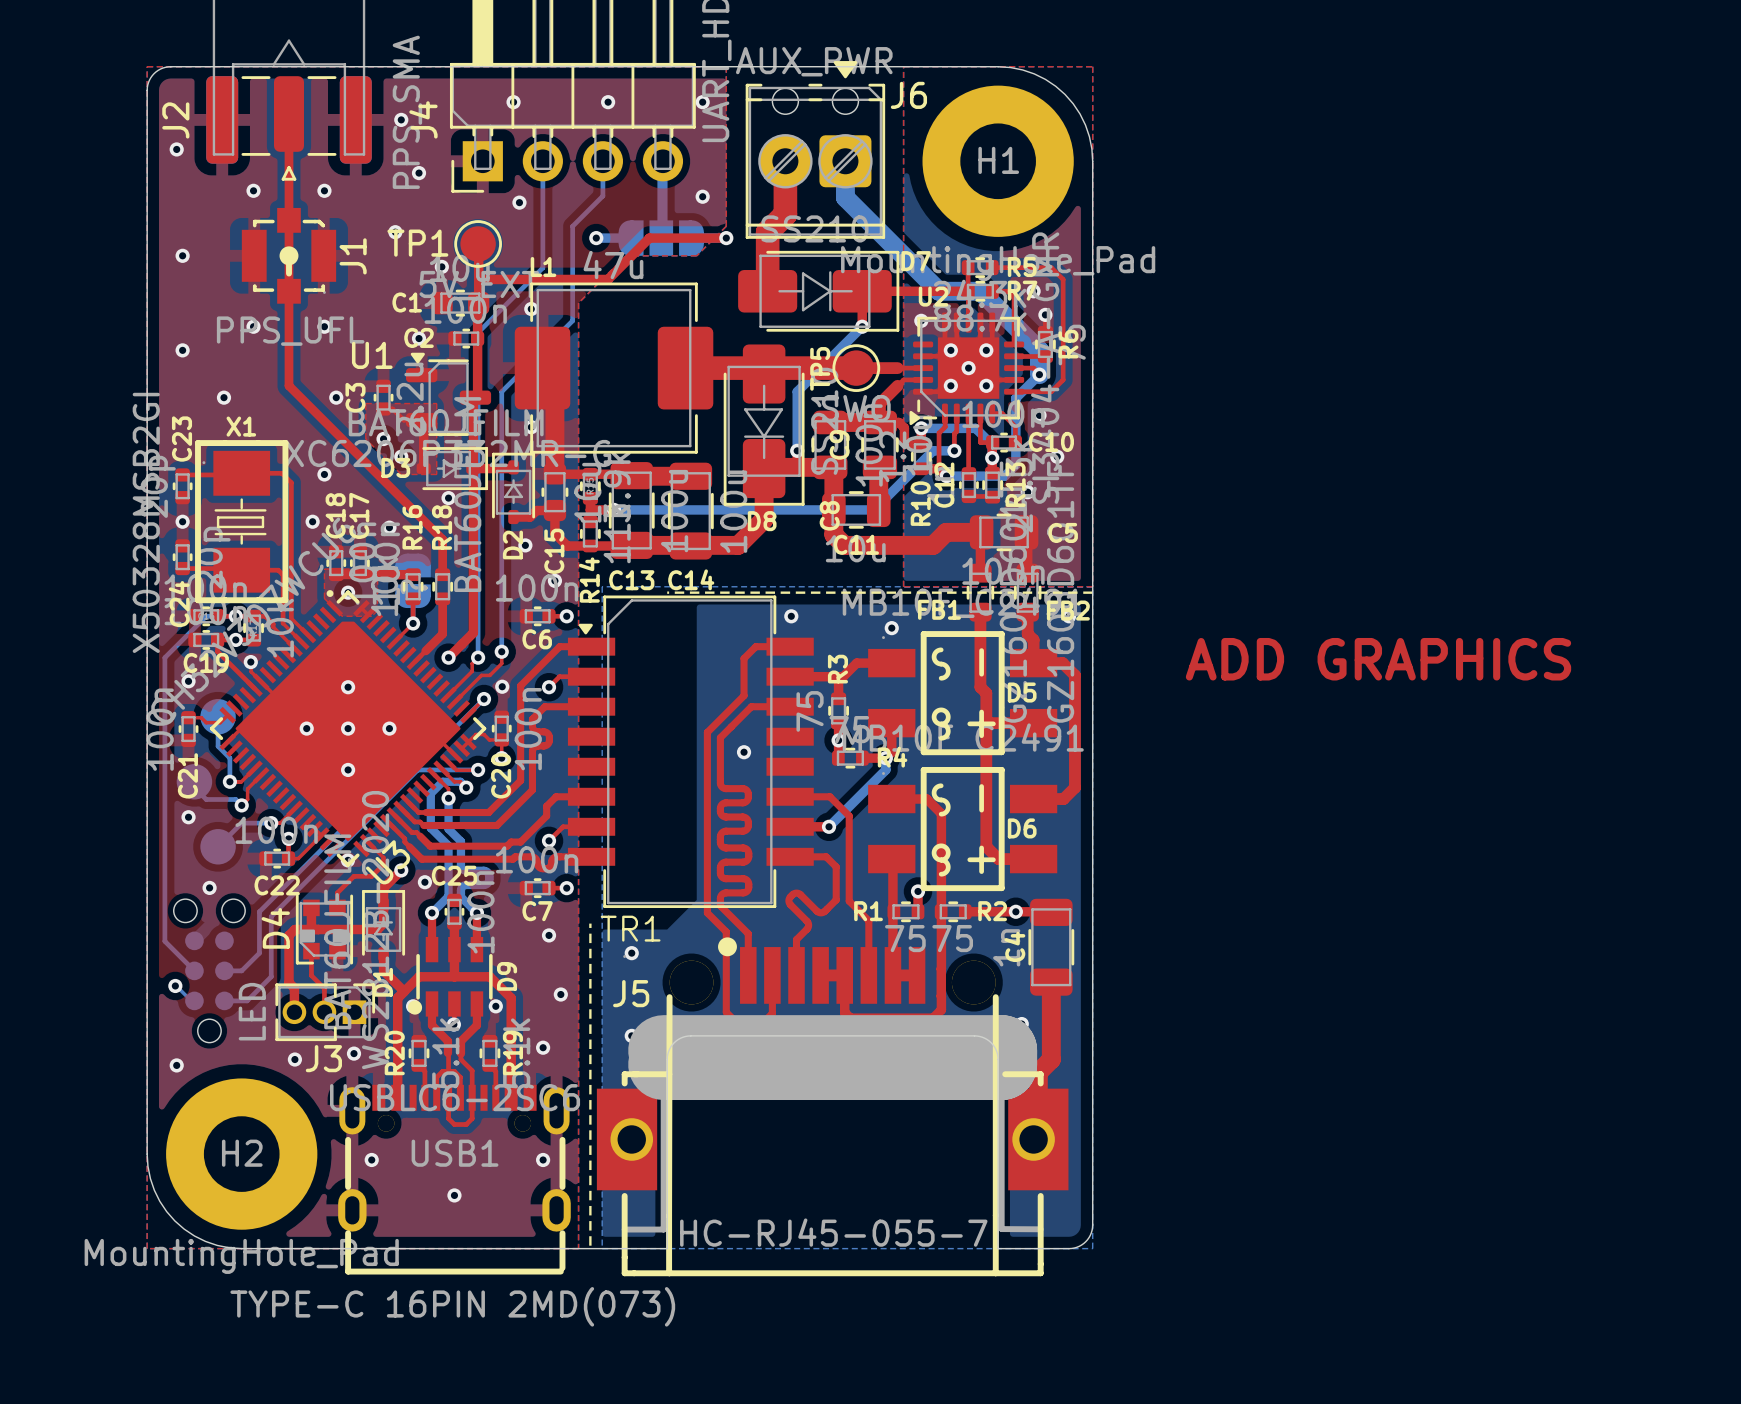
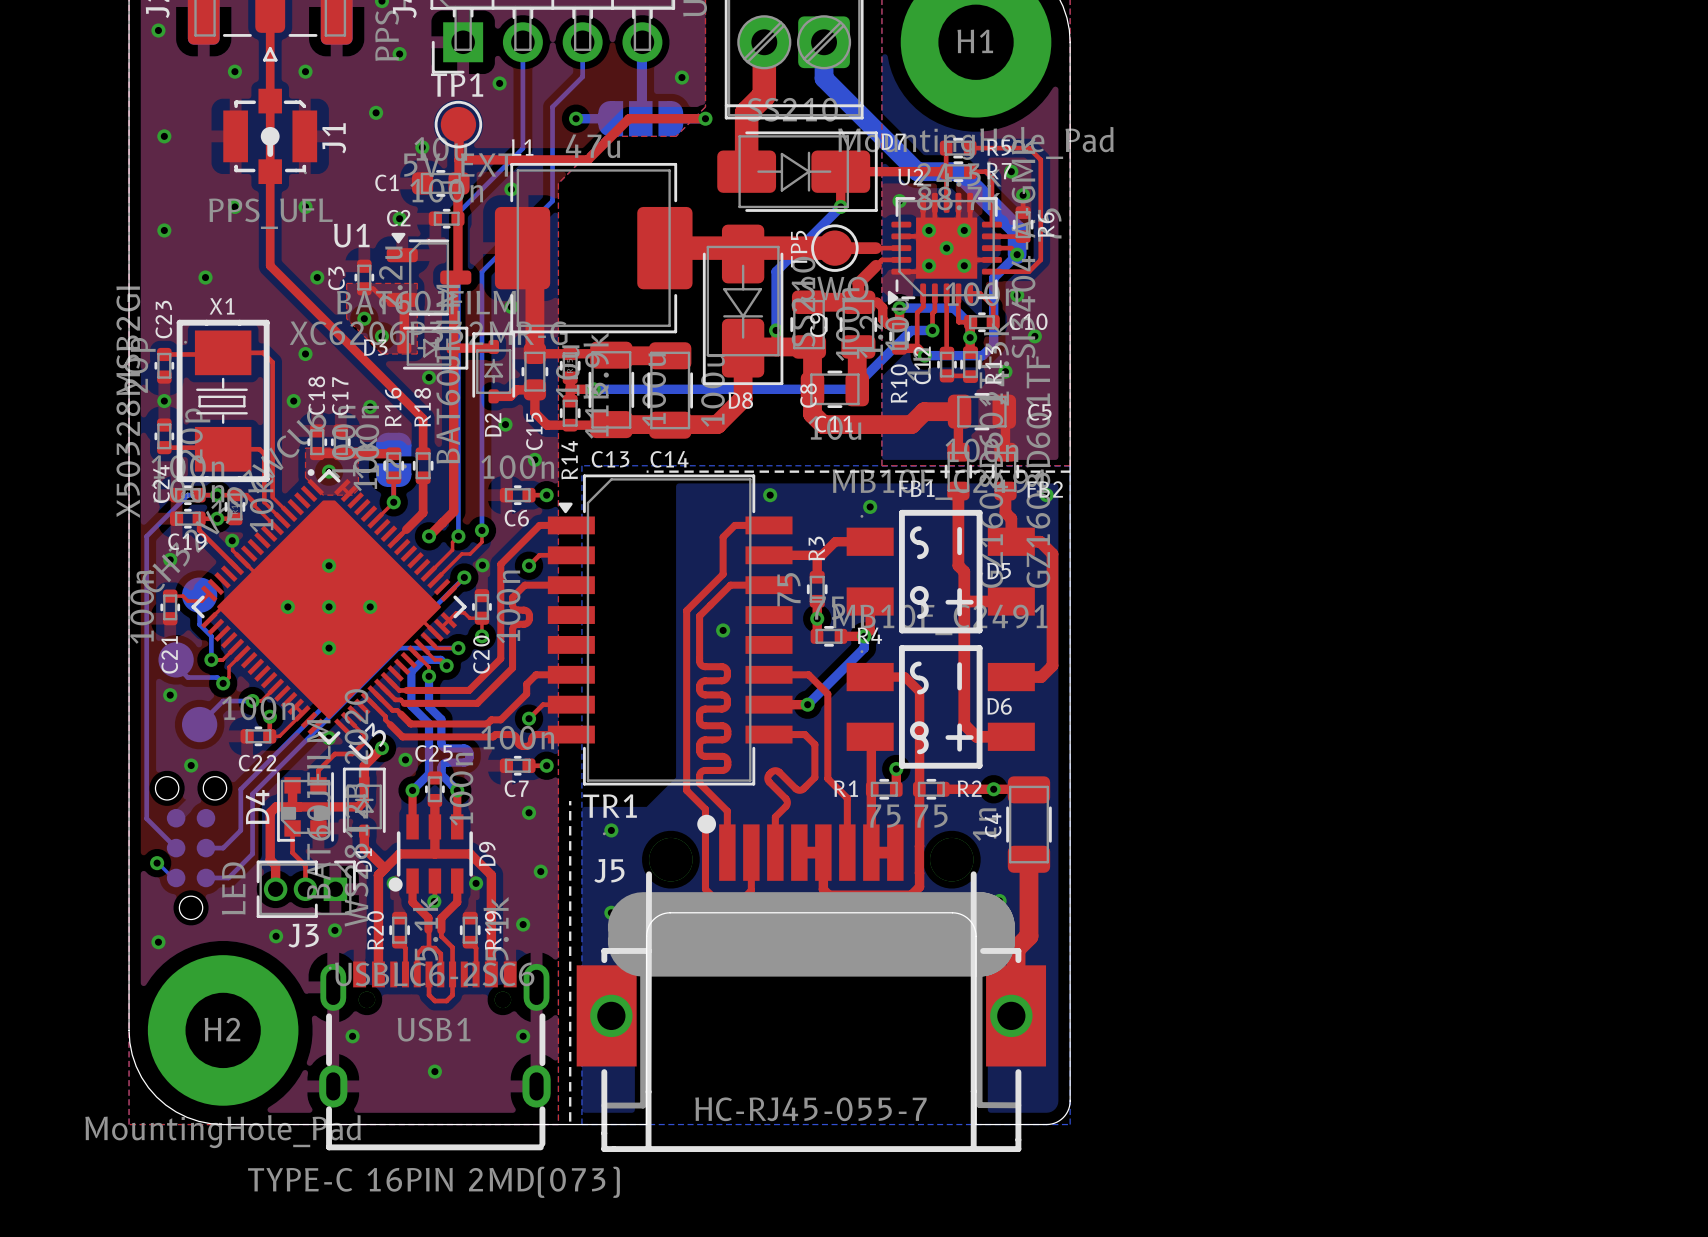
TP1 name position: TP1 (417, 243) -> TP1 (457, 84)
text: ADD GRAPHICS (1378, 659) -> none

